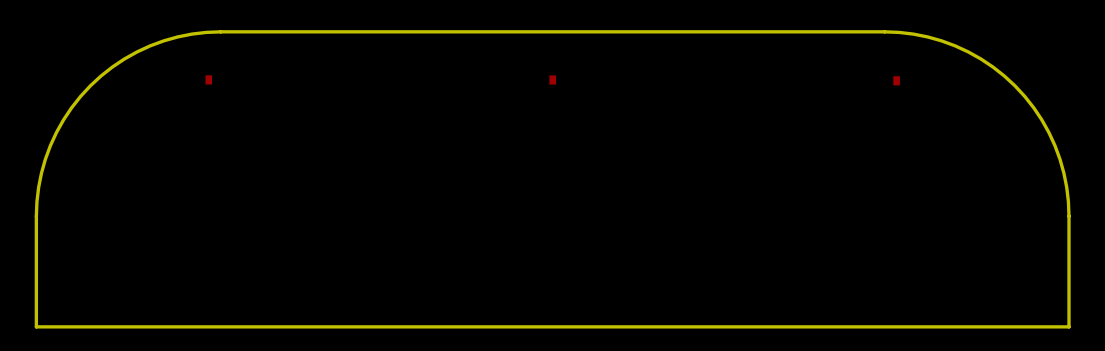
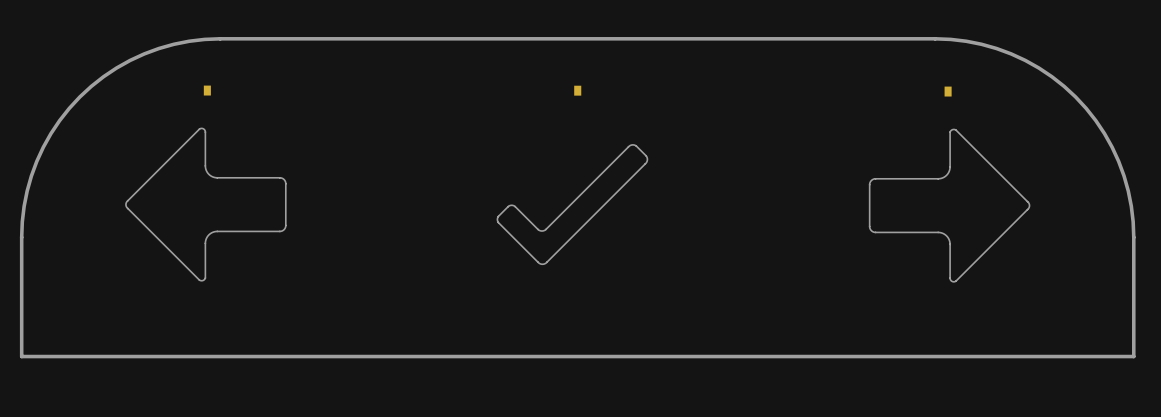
board edge: none -> (199, 129) (125, 204) (201, 280) (205, 278) (205, 240) (211, 233) (279, 231) (284, 229) (285, 183) (280, 177) (211, 176) (205, 167) (205, 131) (202, 128) (199, 129)
board edge: none -> (956, 130) (1029, 205) (953, 281) (950, 278) (949, 241) (944, 234) (875, 232) (870, 230) (869, 184) (874, 178) (944, 177) (949, 168) (950, 132) (952, 129) (956, 130)
board edge: none -> (636, 146) (646, 156) (646, 162) (545, 263) (538, 262) (497, 221) (498, 216) (508, 206) (512, 205) (538, 229) (544, 230) (628, 146) (636, 146)

